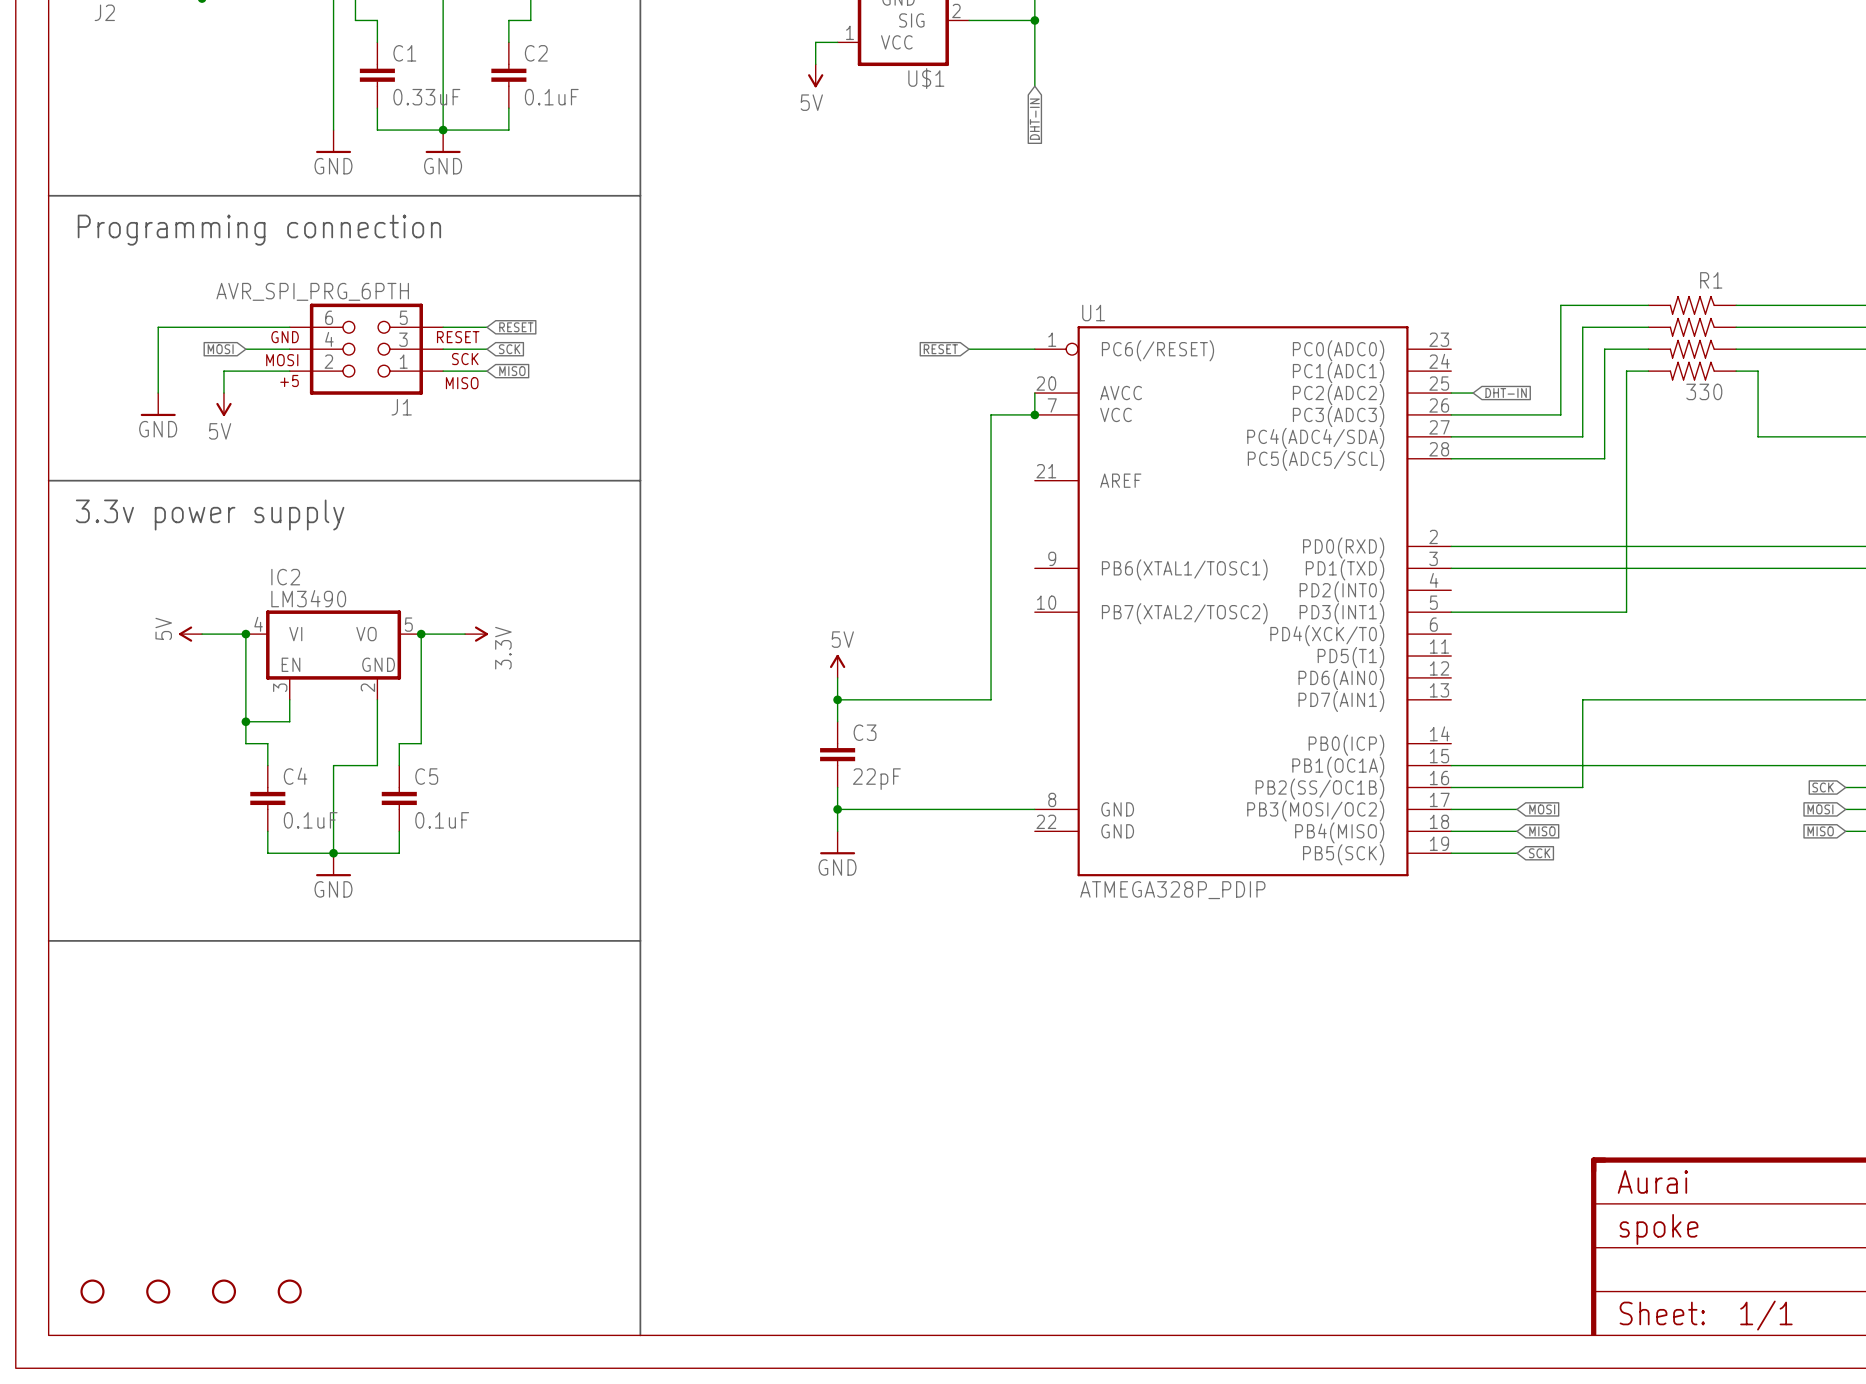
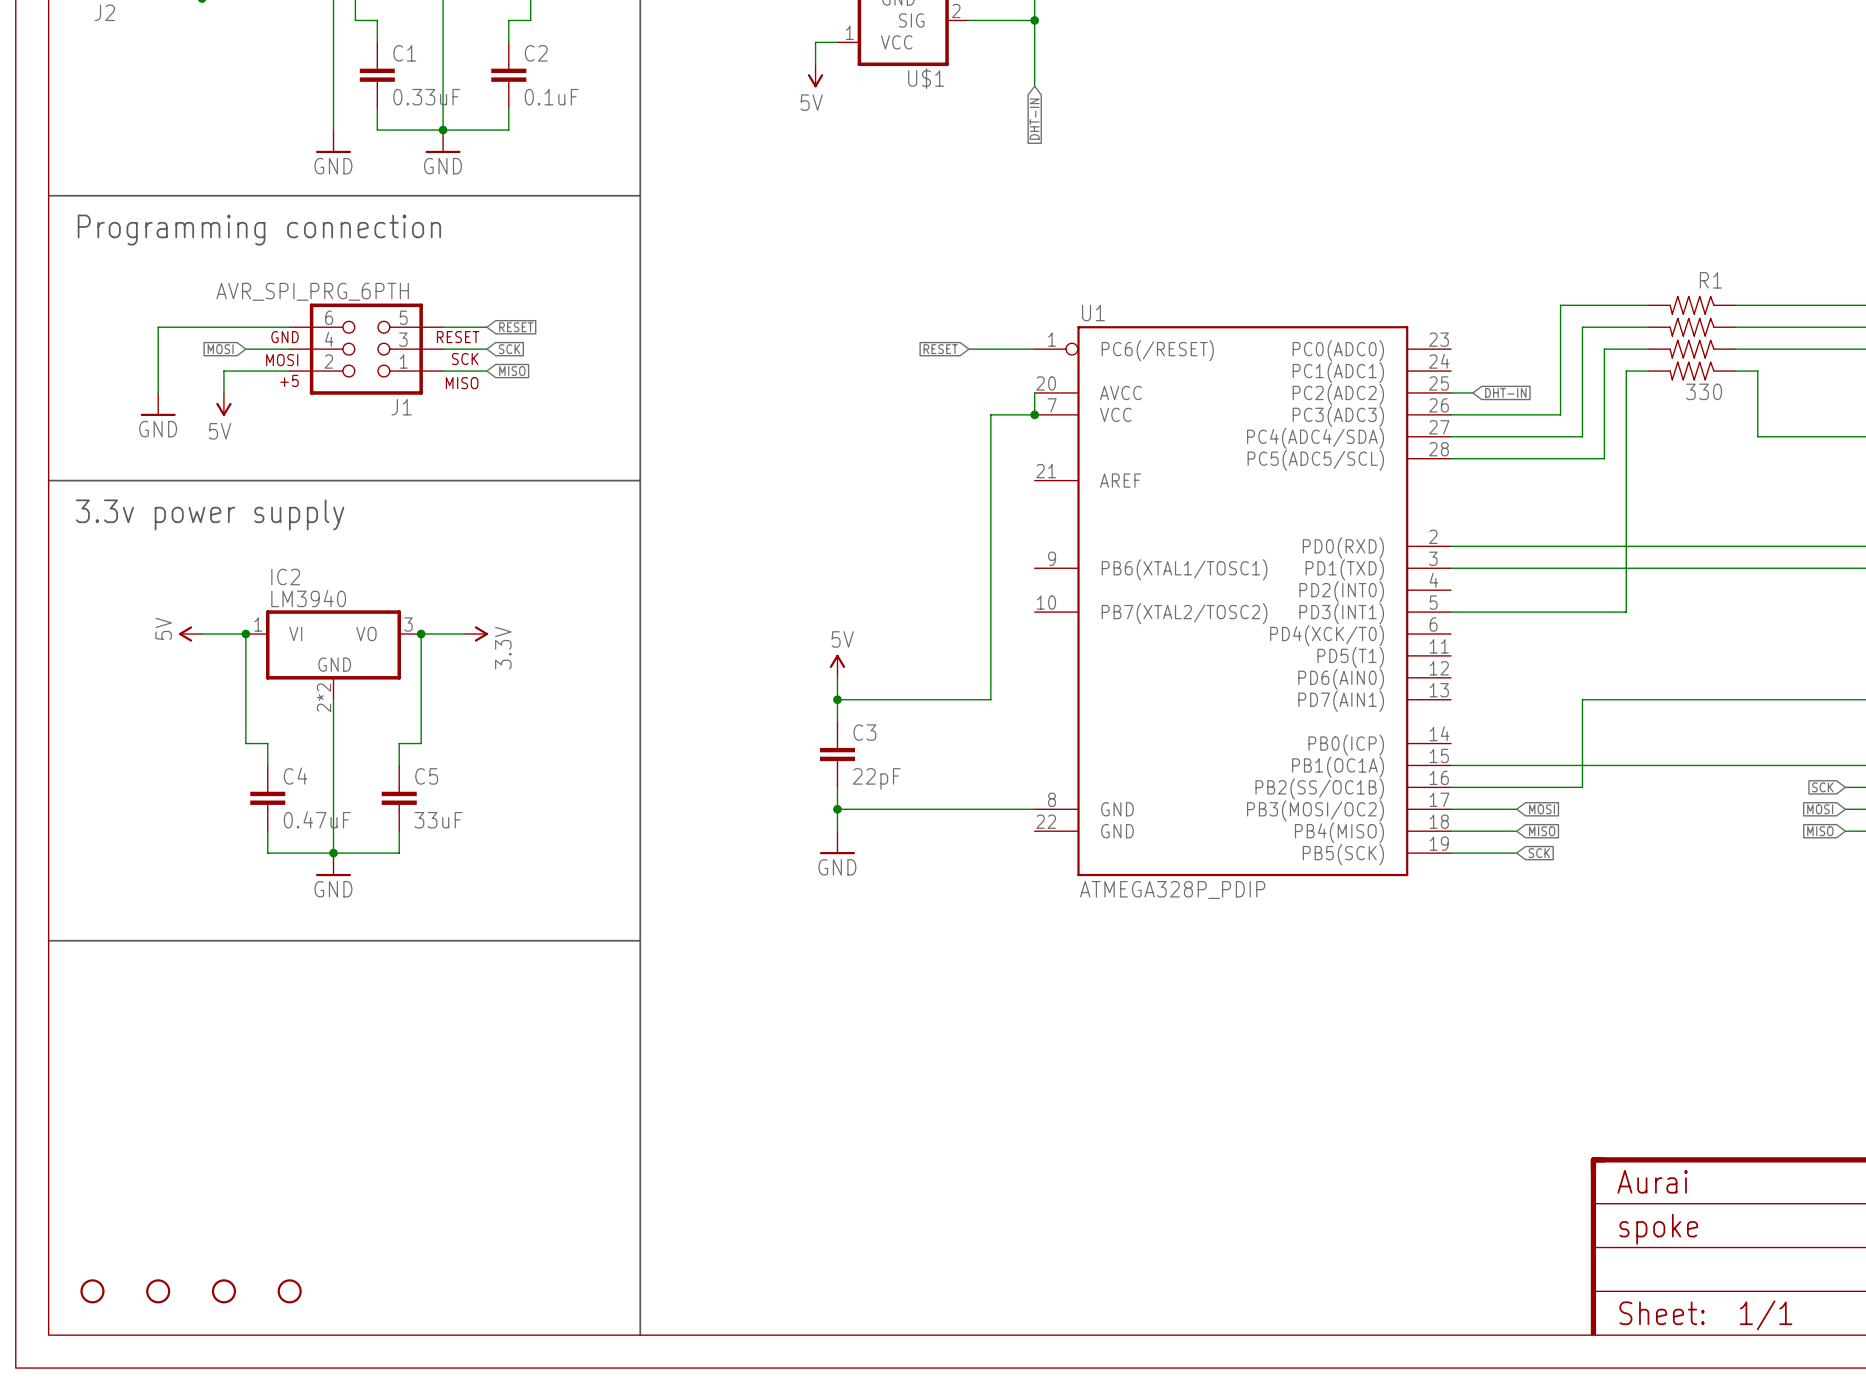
IC2 value: LM3490 (308, 598) -> LM3940 (308, 598)
IC2 symbol: [245, 610, 422, 700] -> [245, 610, 422, 700]
wire: (289, 699) (289, 721) (245, 721) -> none
wire: (377, 699) (377, 765) (333, 765) -> (333, 699) (333, 765)
junction: (245, 721) -> none
C4 value: 0.1uF (310, 820) -> 0.47uF (317, 819)
C5 value: 0.1uF (442, 820) -> 33uF (438, 820)

